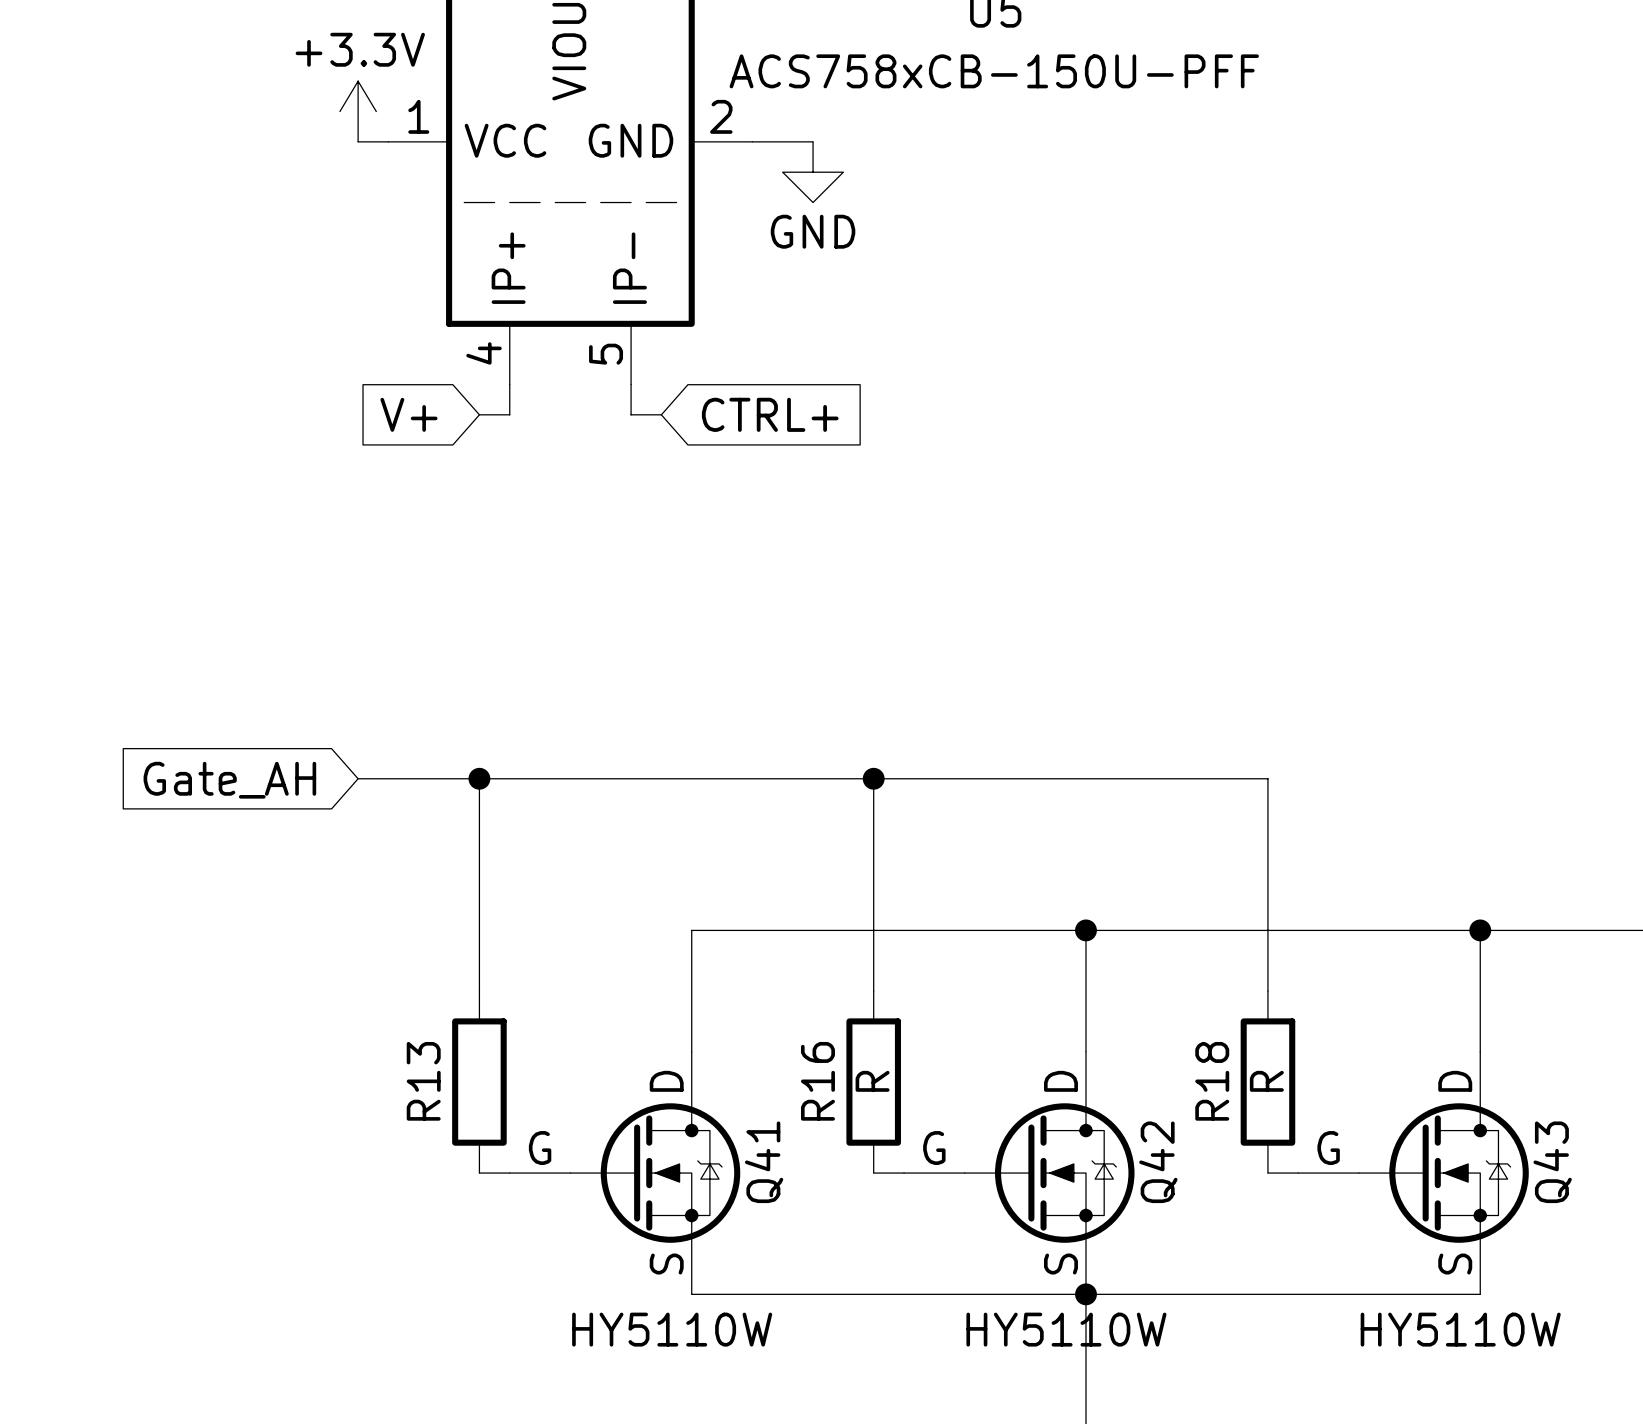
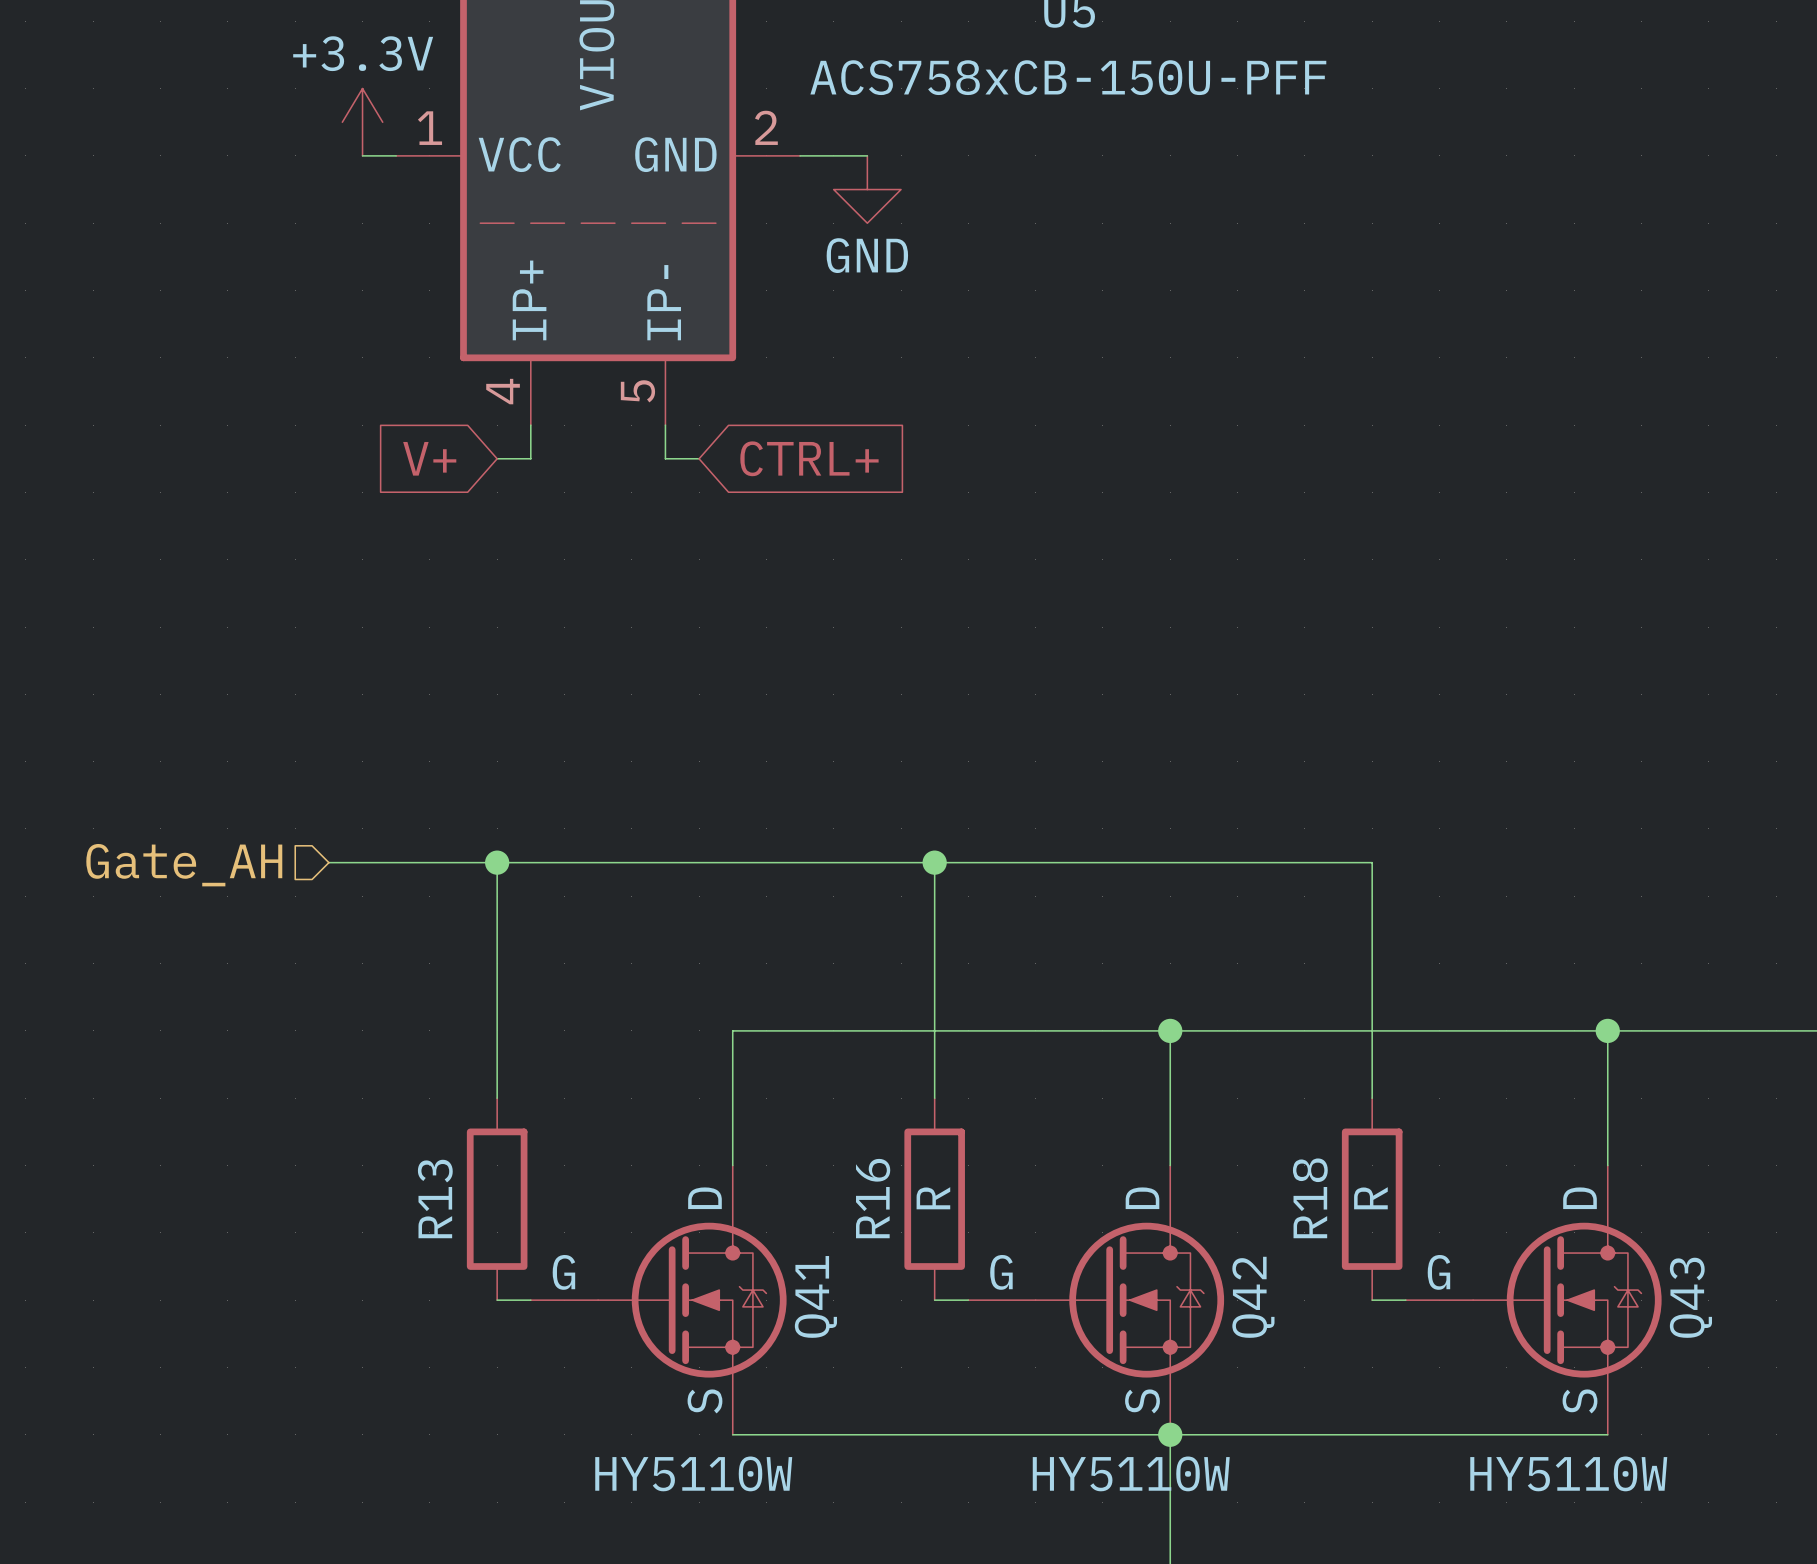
wire: none -> (328, 862) (362, 862)
hierarchical label: none -> Gate_AH (184, 865)
global label: Gate_AH (229, 780) -> none

